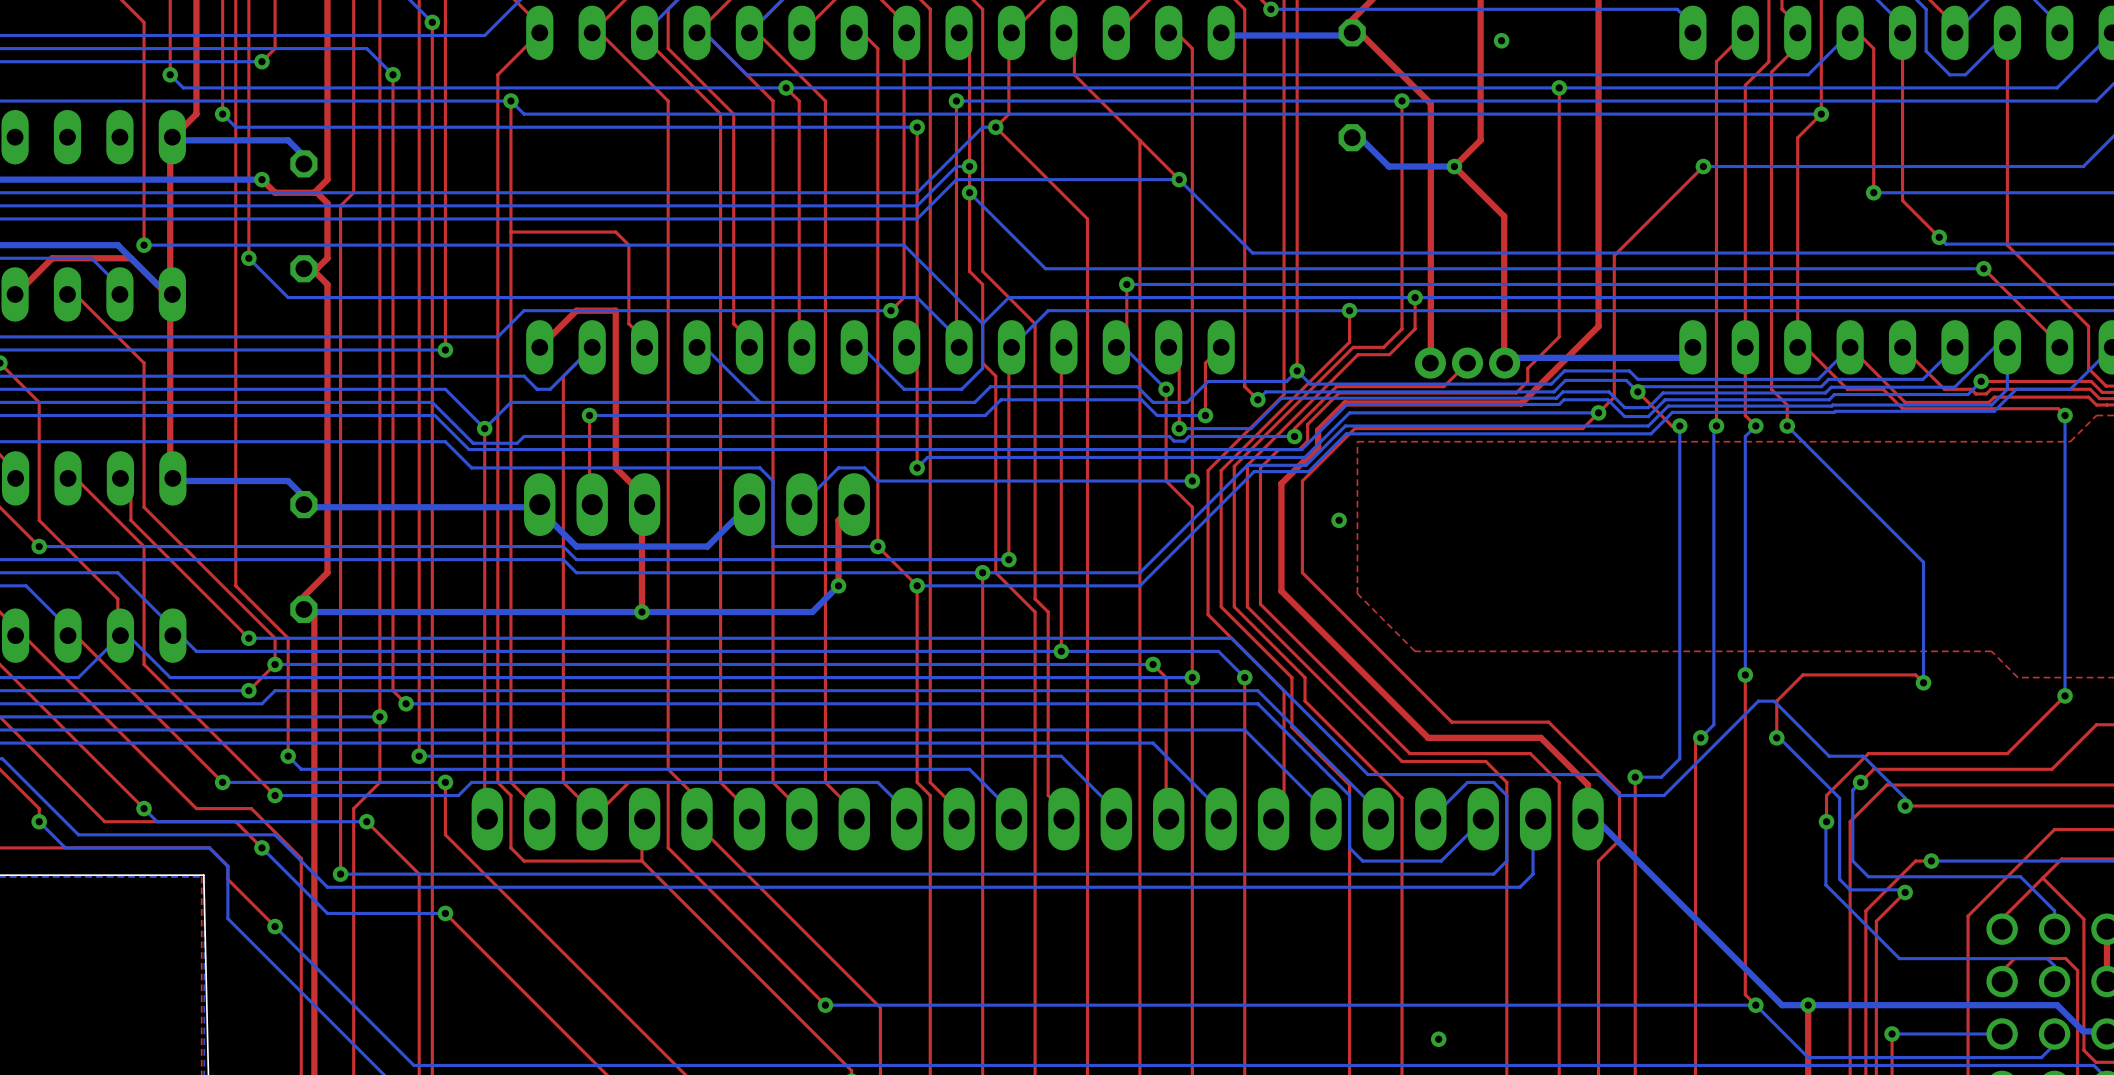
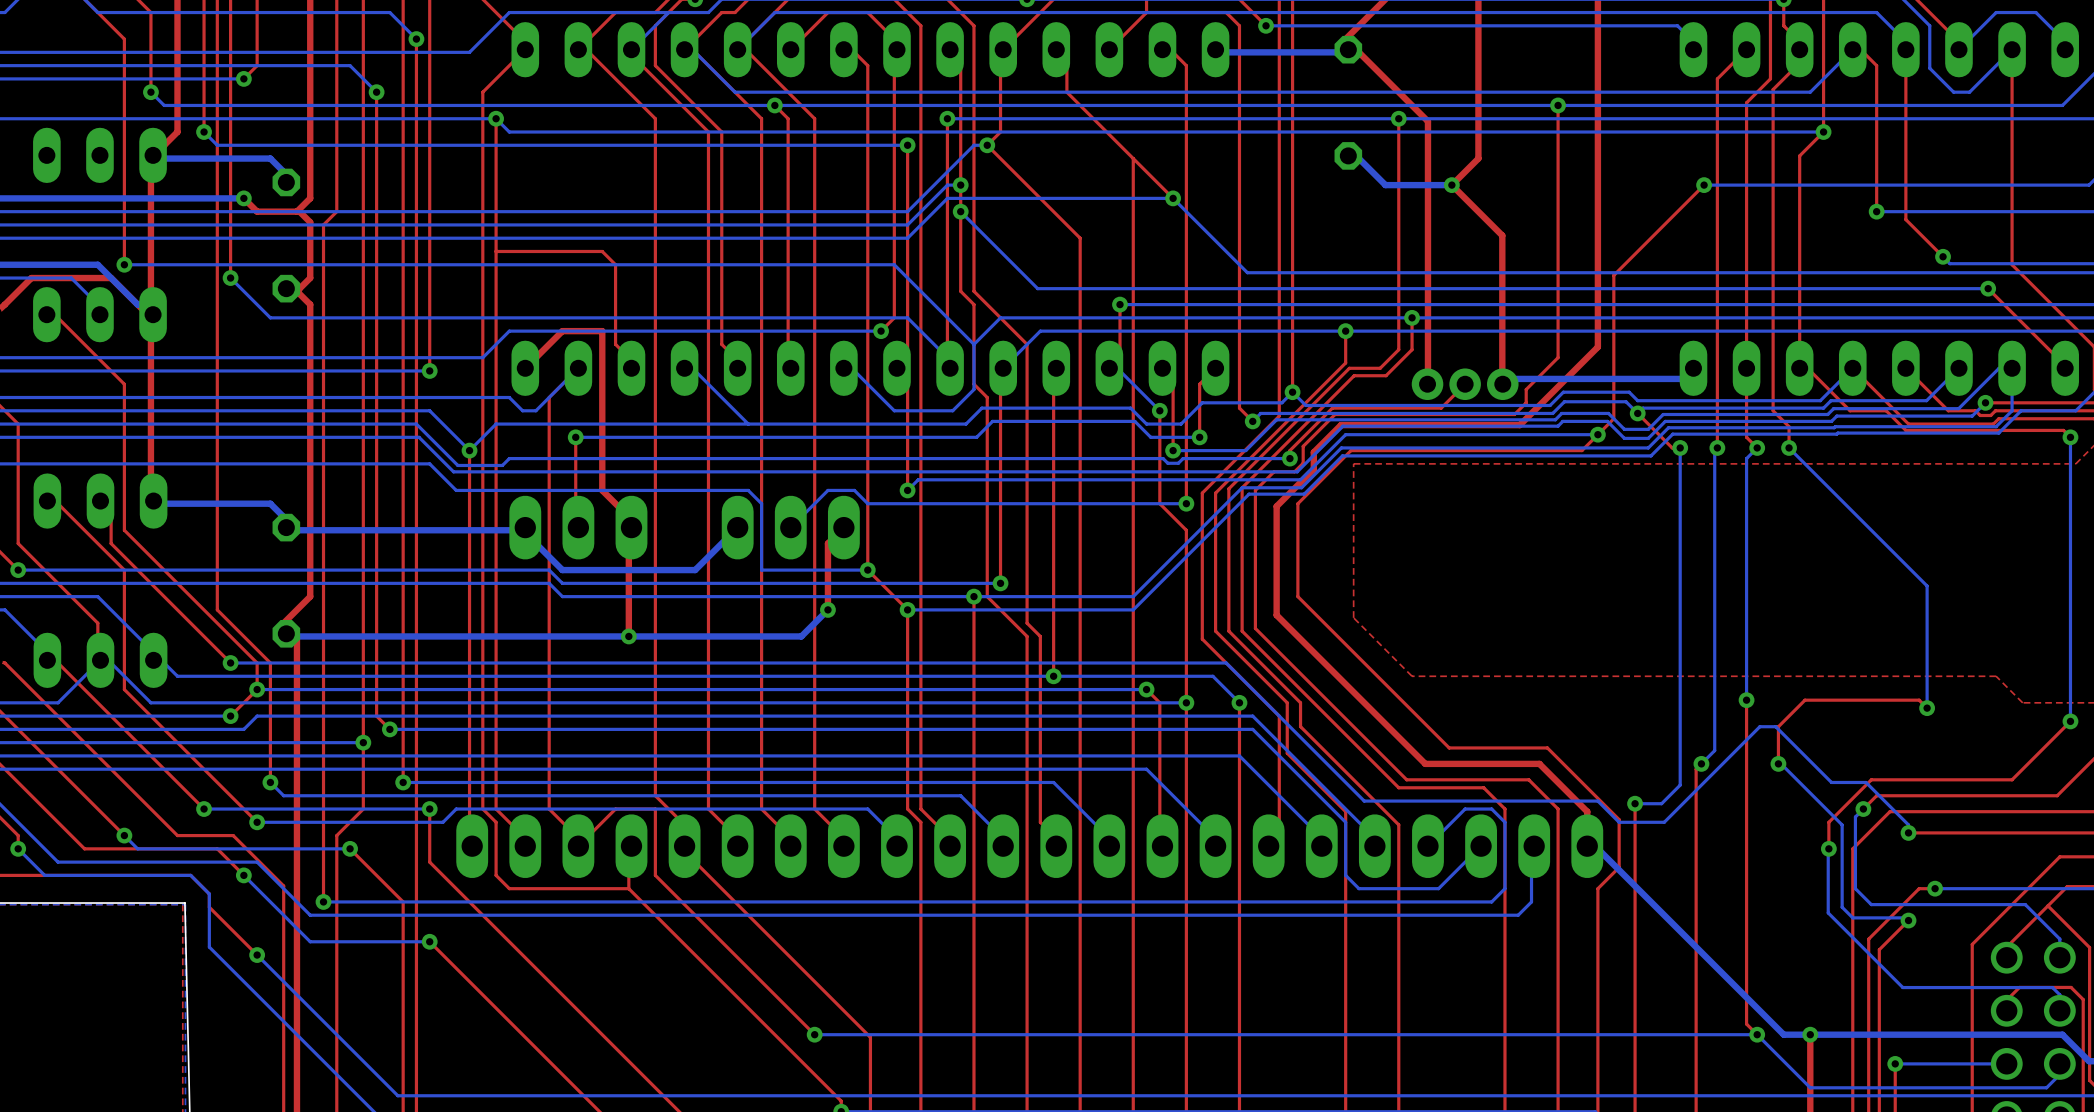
via: (1501, 40) -> none
via: (1339, 520) -> none
via: (1438, 1039) -> none

